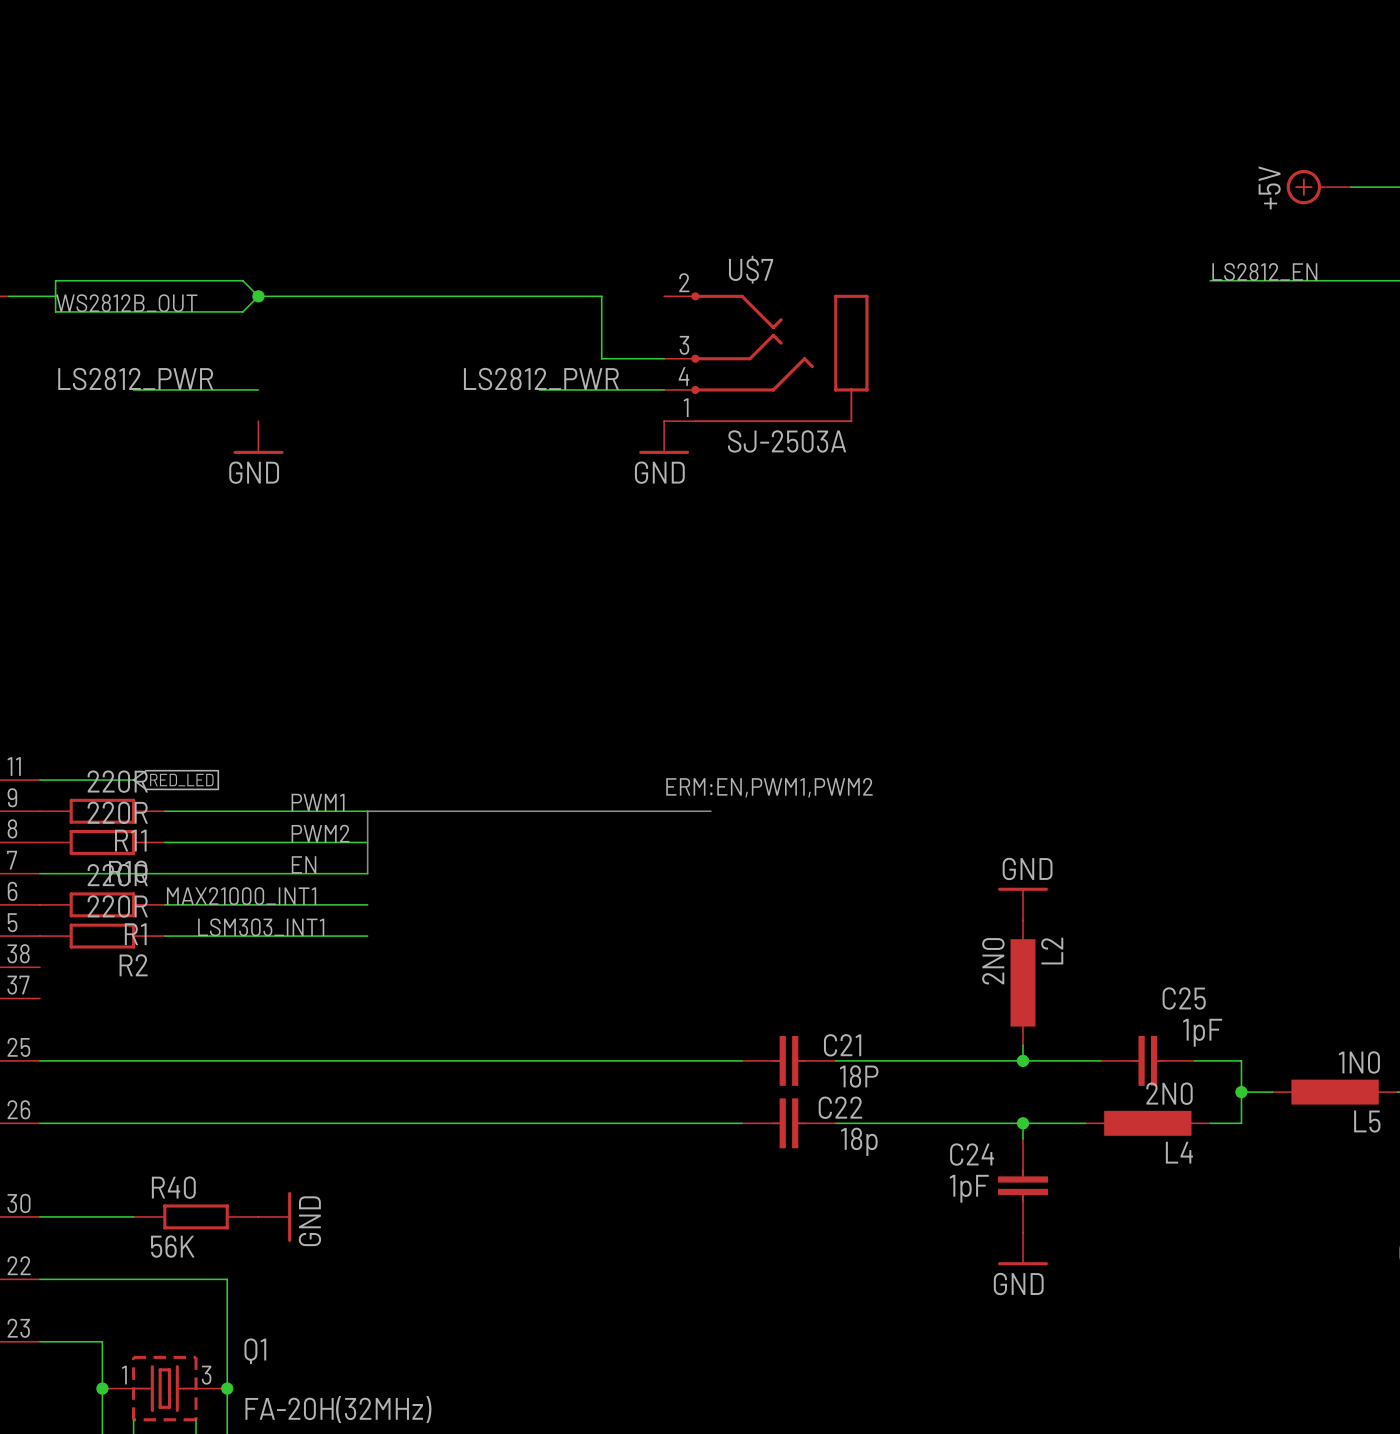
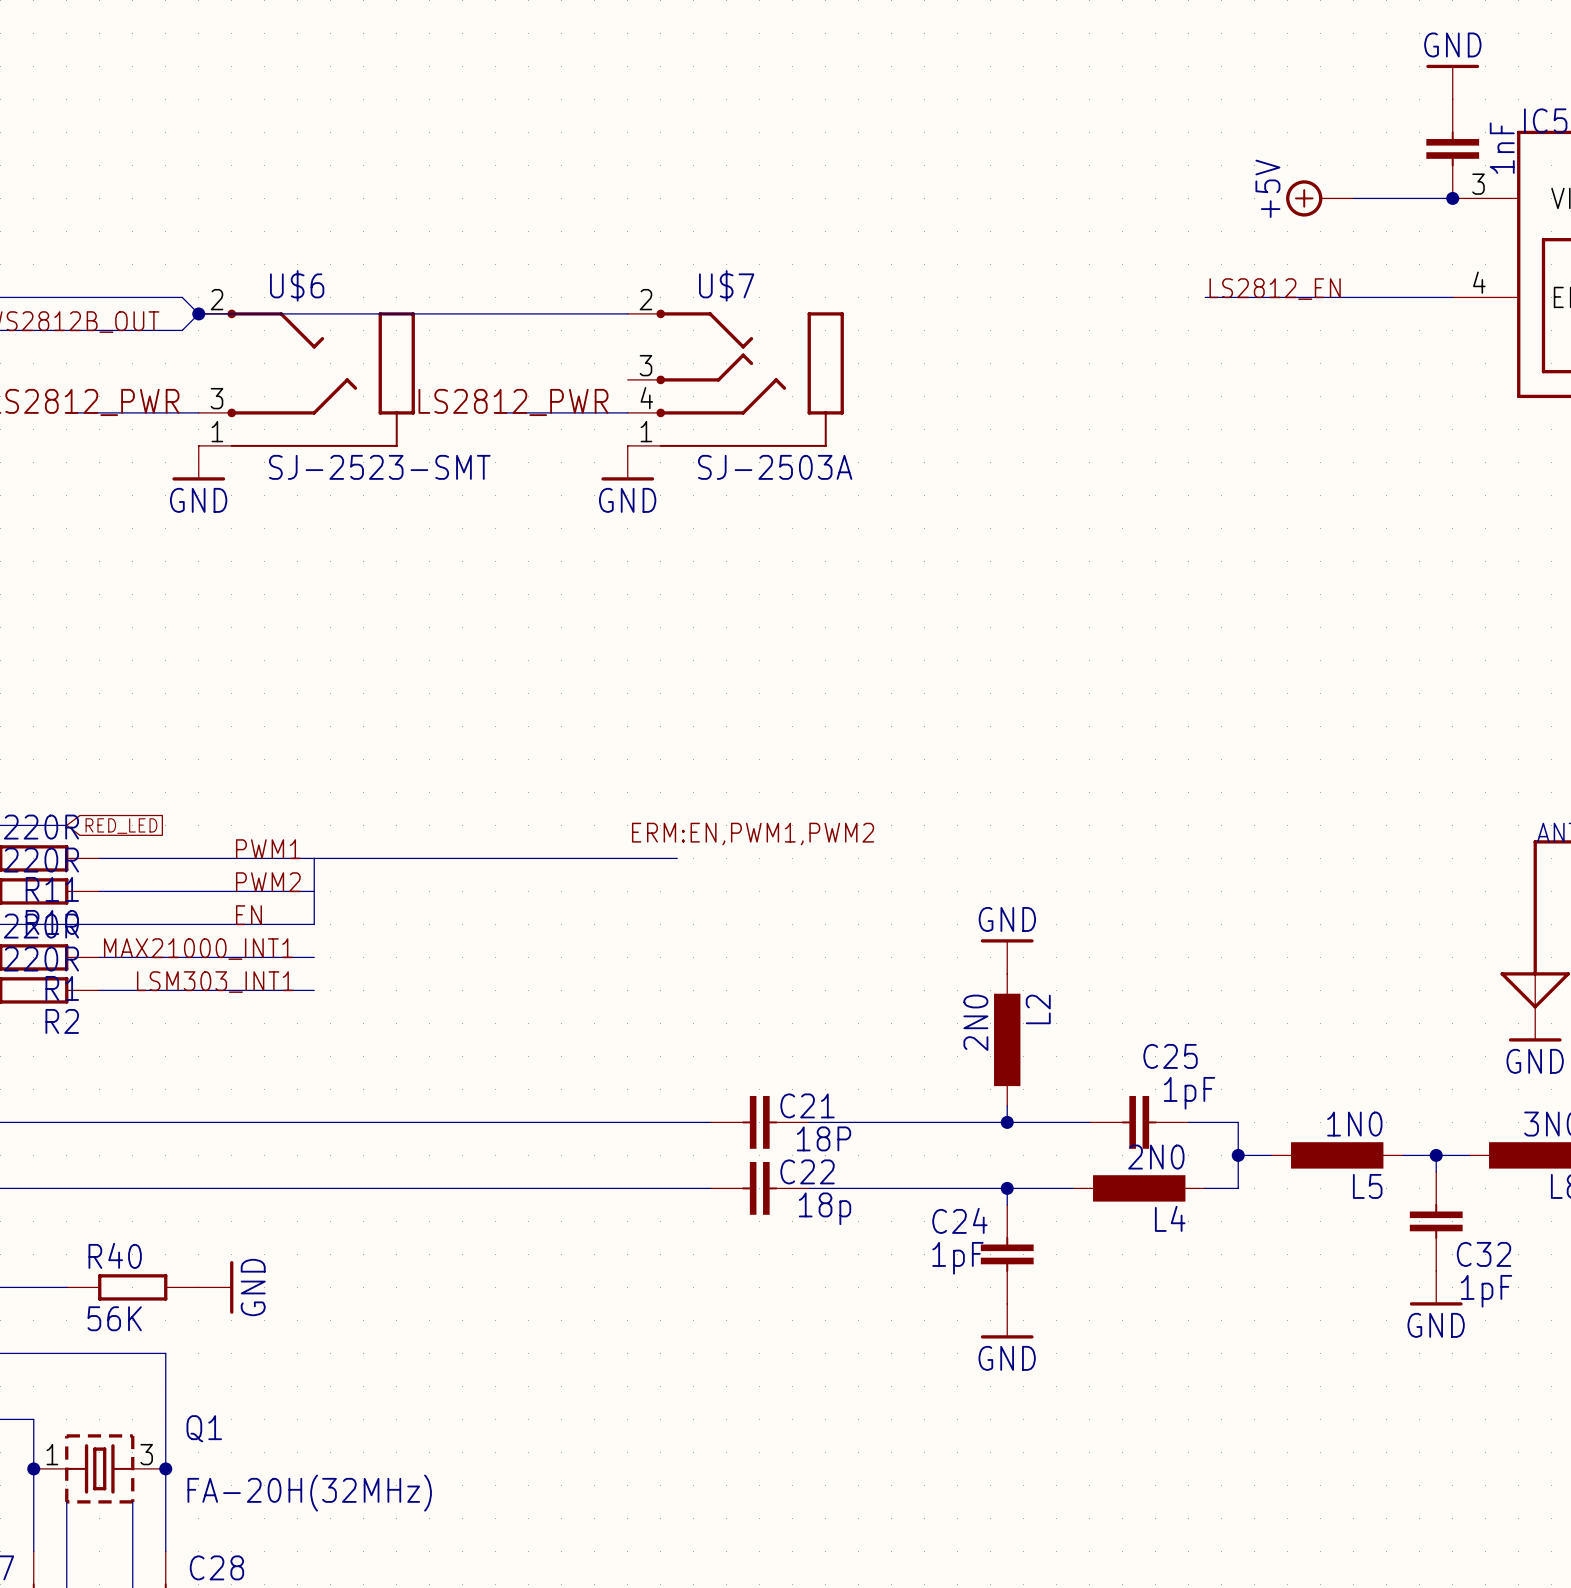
wire: (601, 296) (601, 358) (664, 358) -> (561, 313) (627, 313)
U$6: none -> SJ-2523-SMT (306, 378)

